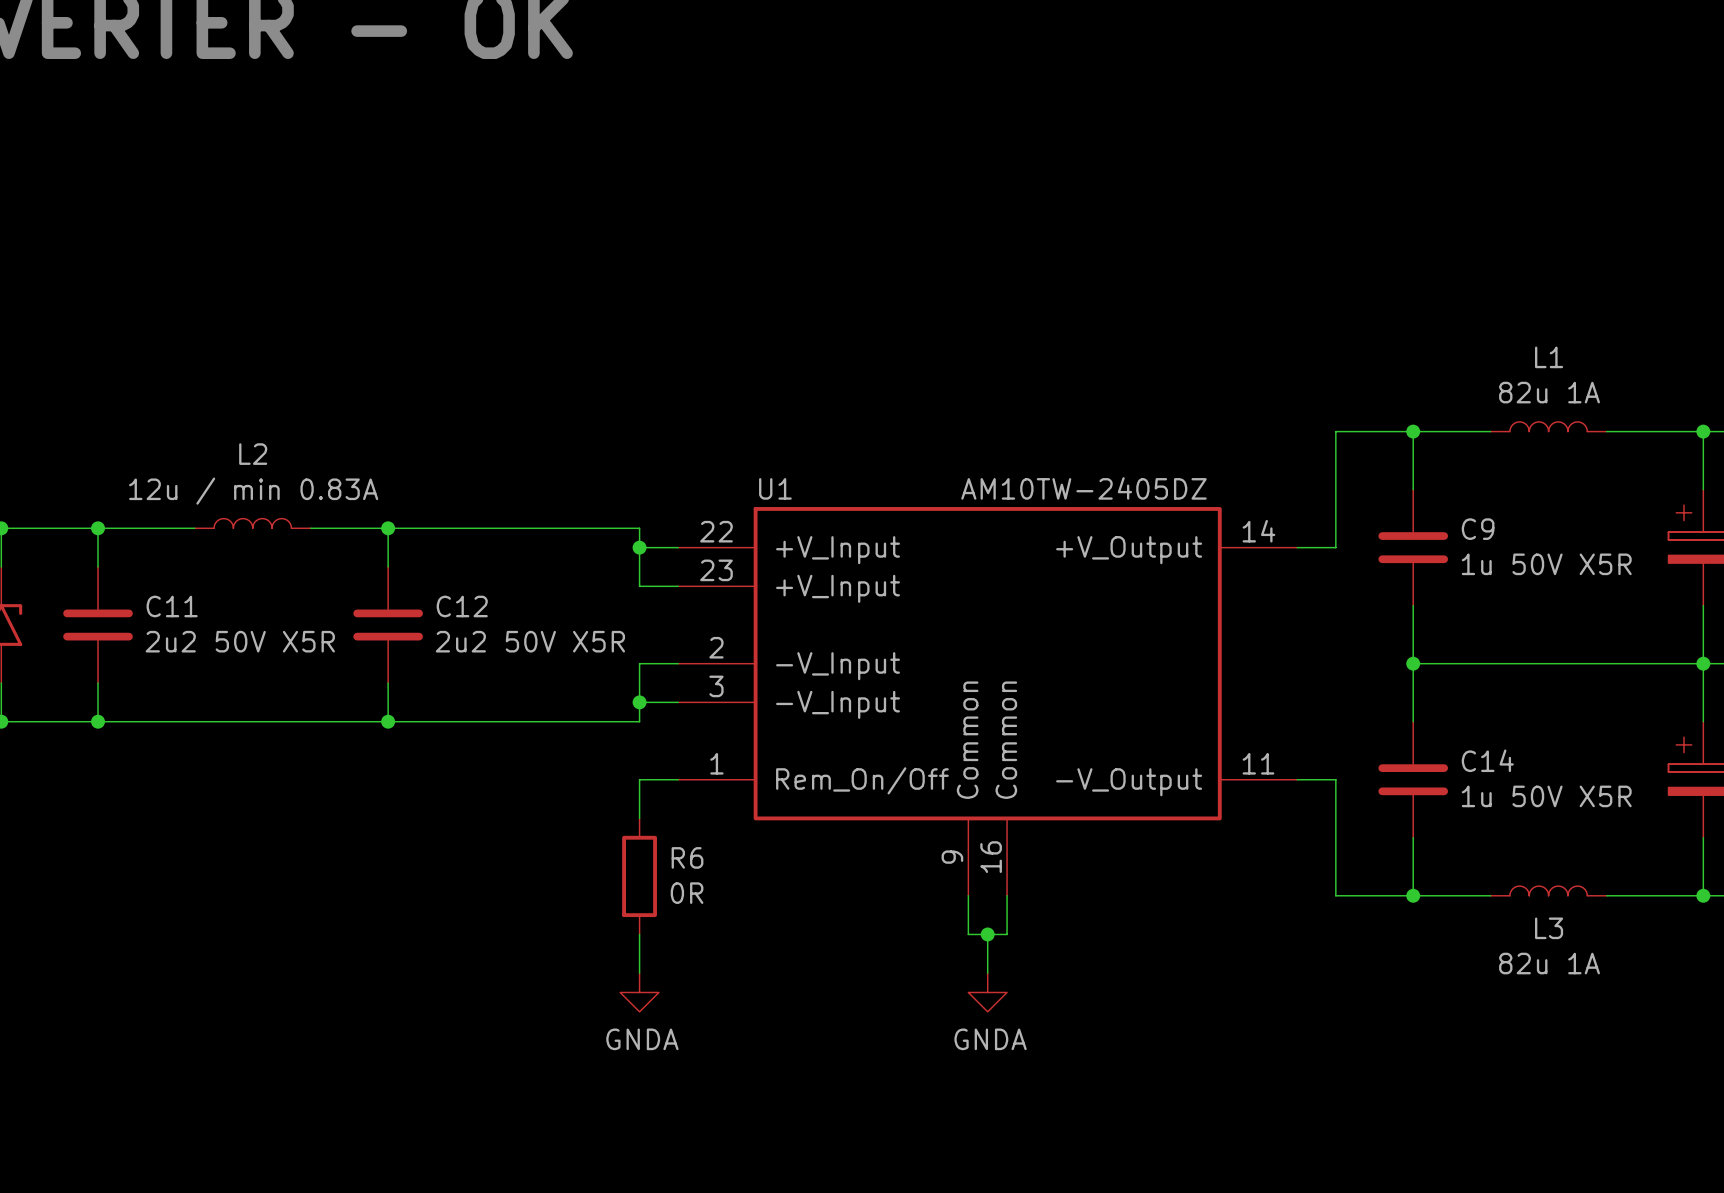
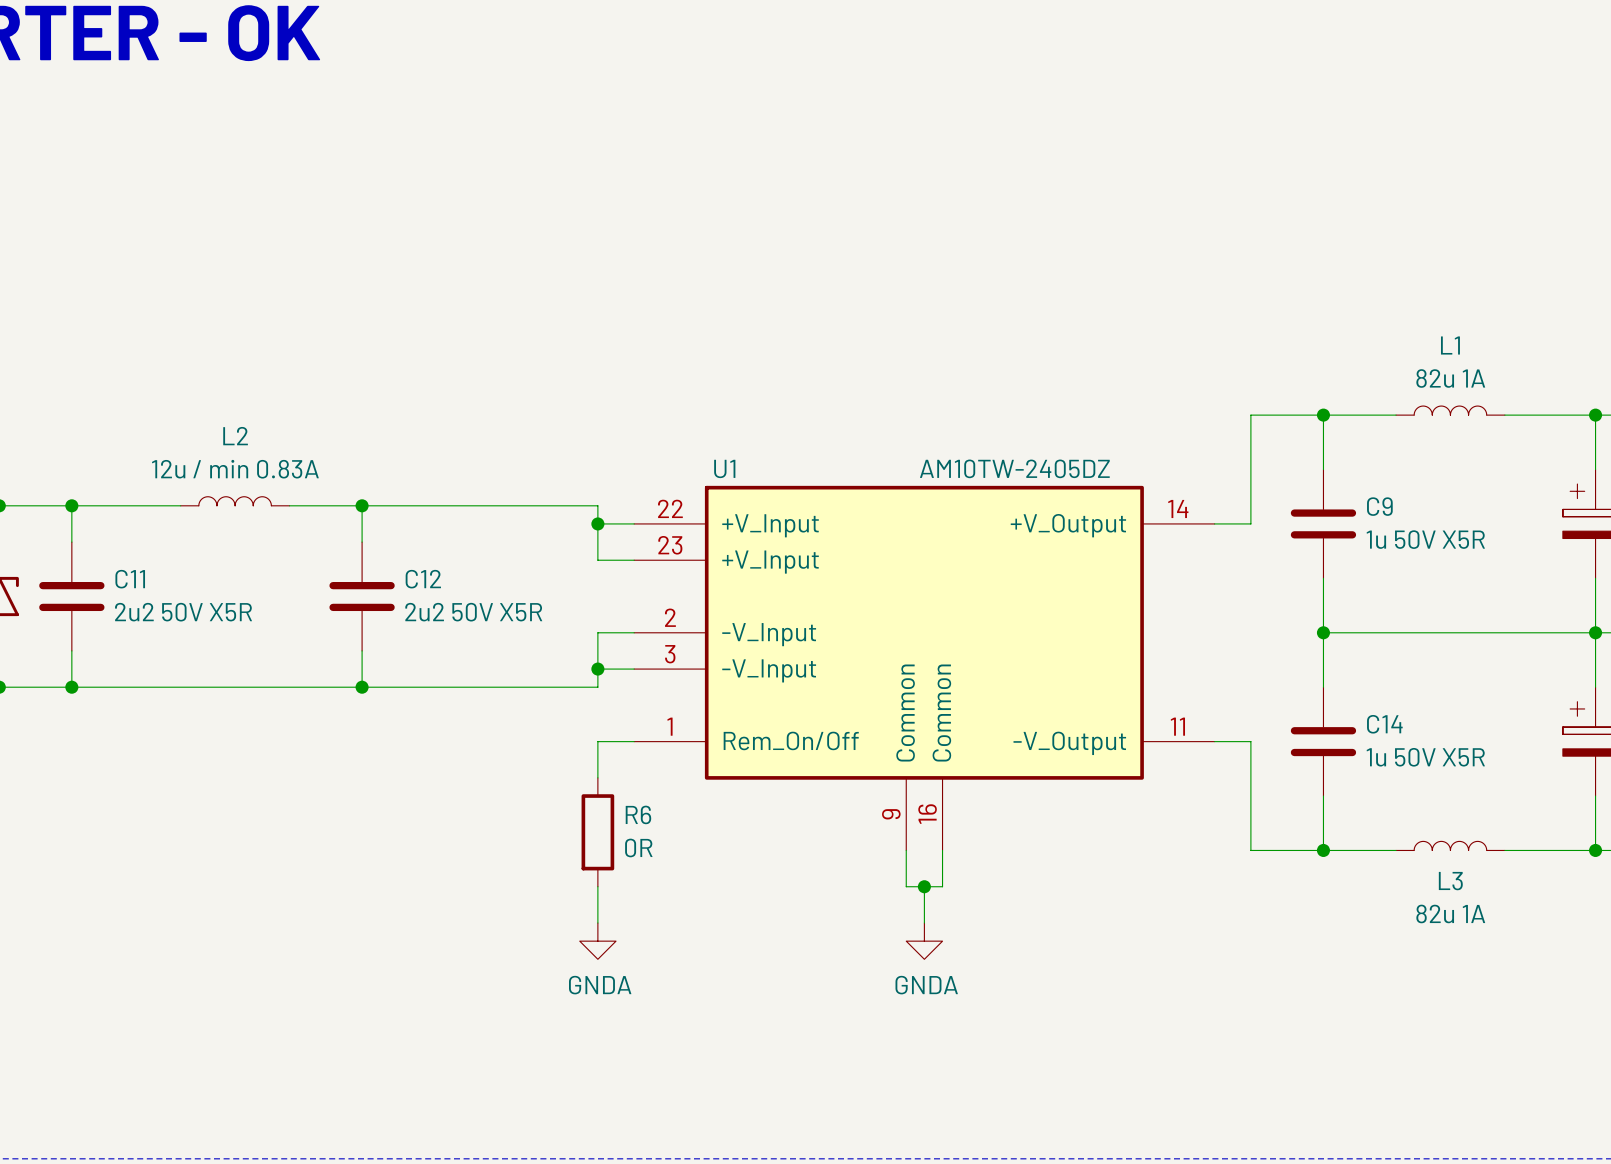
wire: (98, 528) (98, 566) -> (71, 505) (71, 542)
junction position: (98, 528) -> (71, 505)
C11 position: (98, 625) -> (71, 596)
wire: (98, 683) (98, 721) -> (71, 650) (71, 687)
junction position: (98, 721) -> (71, 687)

